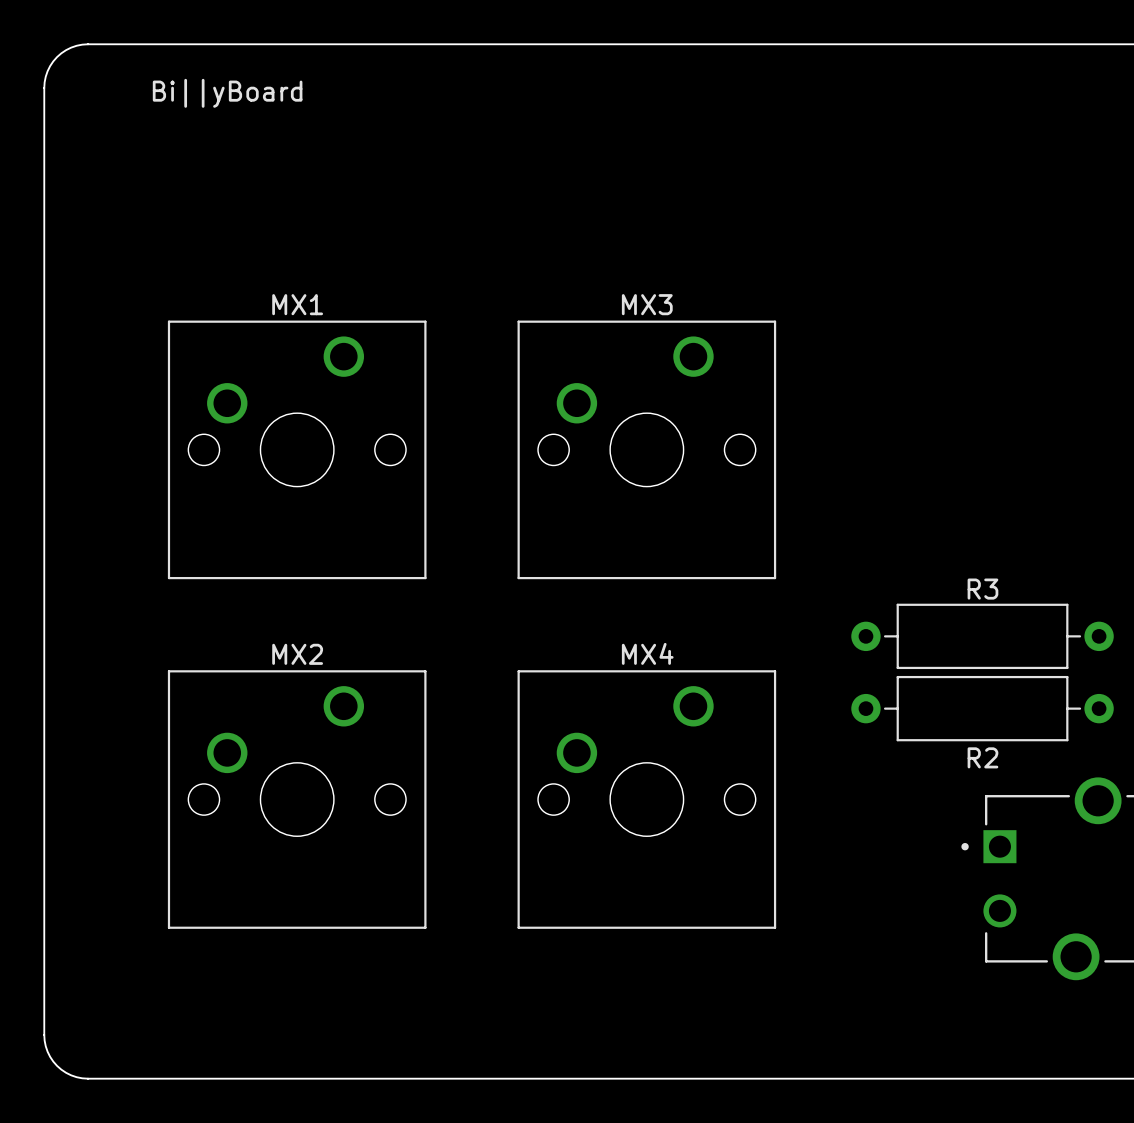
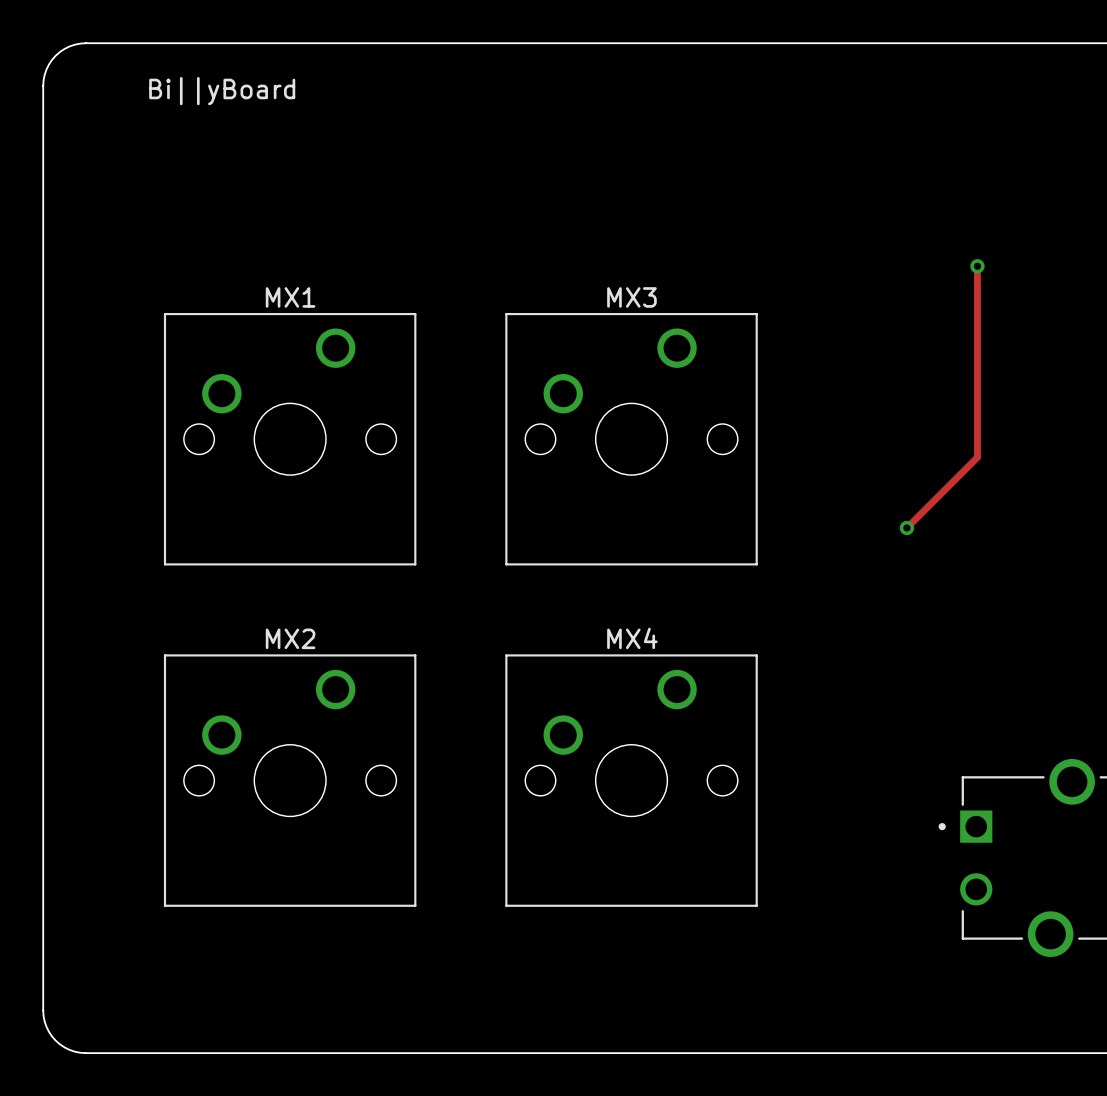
track: none -> (977, 266) (977, 457) (906, 527)
via: none -> (977, 266)
via: none -> (906, 527)
R3: (982, 636) -> none
R2: (982, 708) -> none

